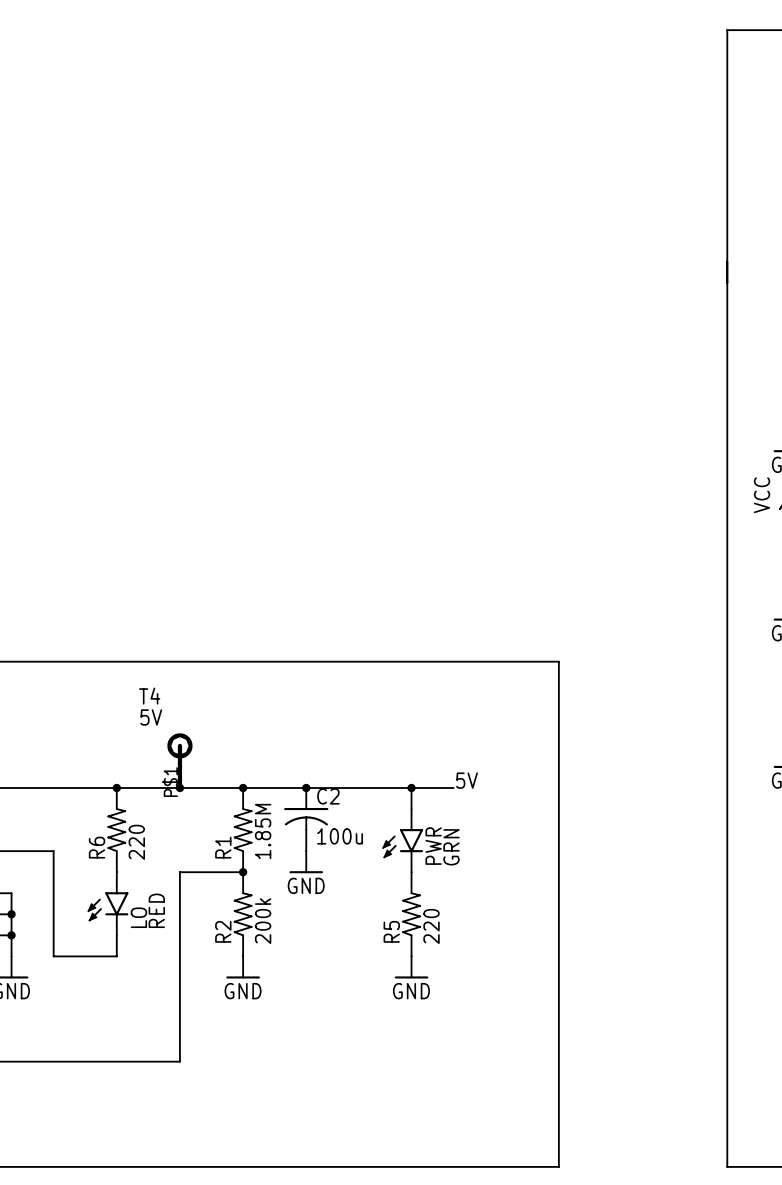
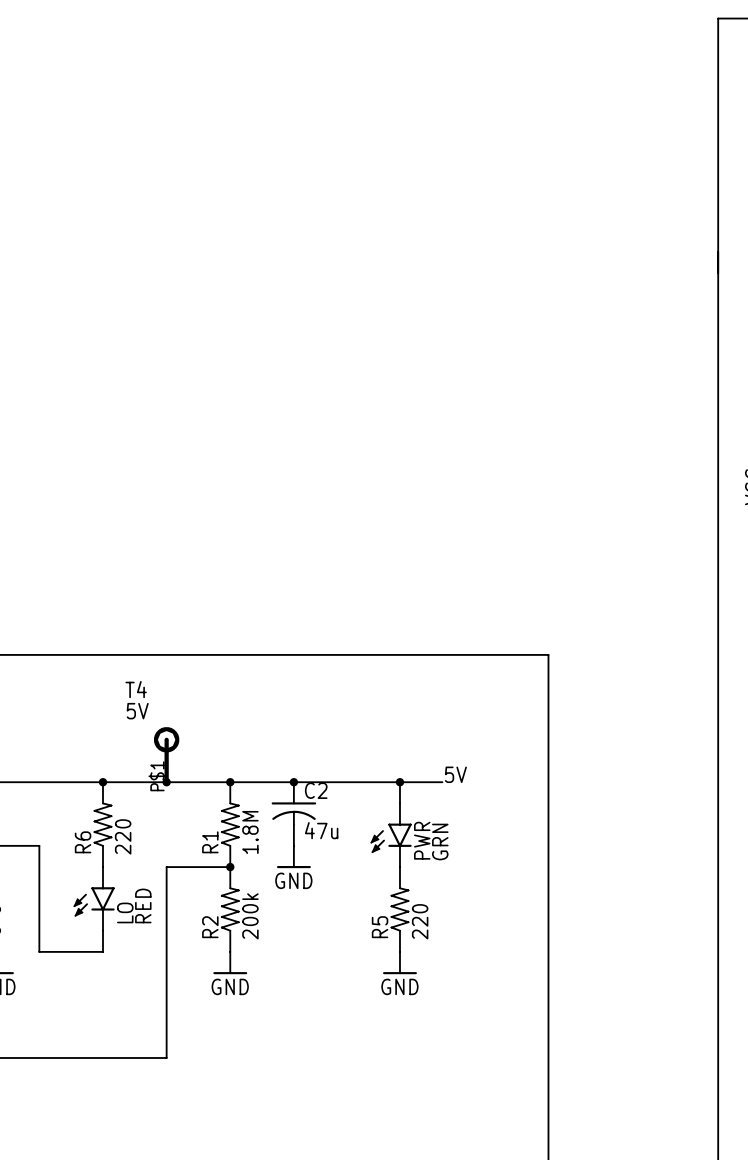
R1 value: 1.85M (263, 831) -> 1.8M (250, 832)
C2 value: 100u (340, 836) -> 47u (321, 830)

